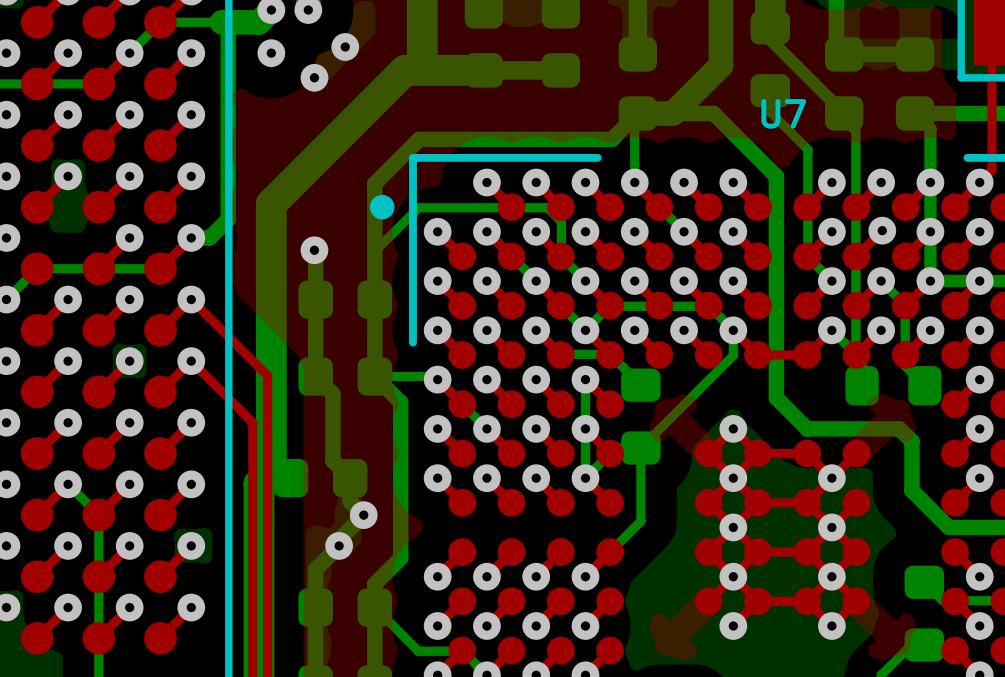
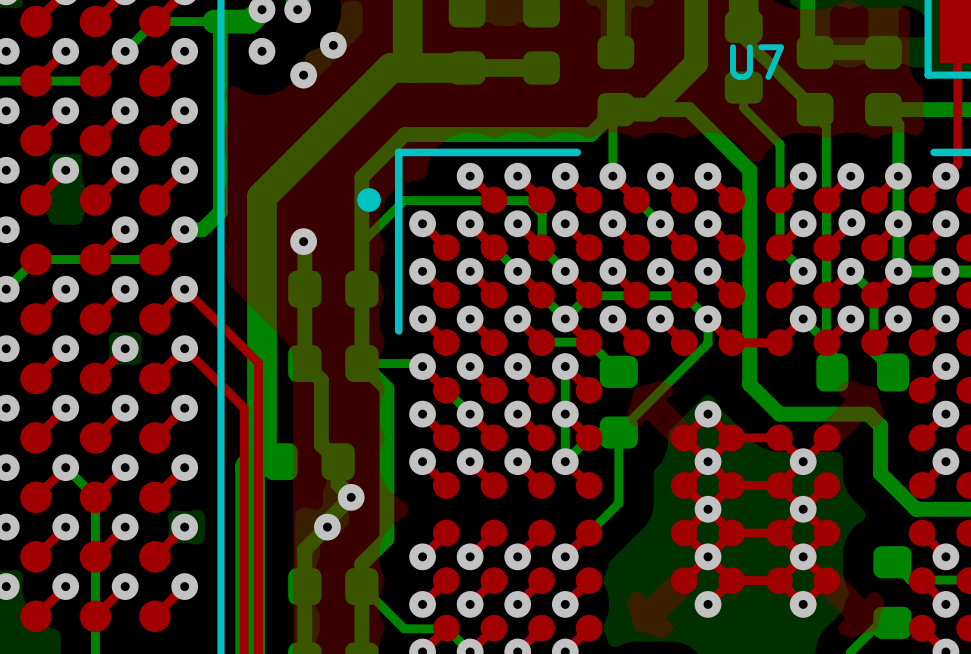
U7 name position: U7 (783, 113) -> U7 (757, 62)

